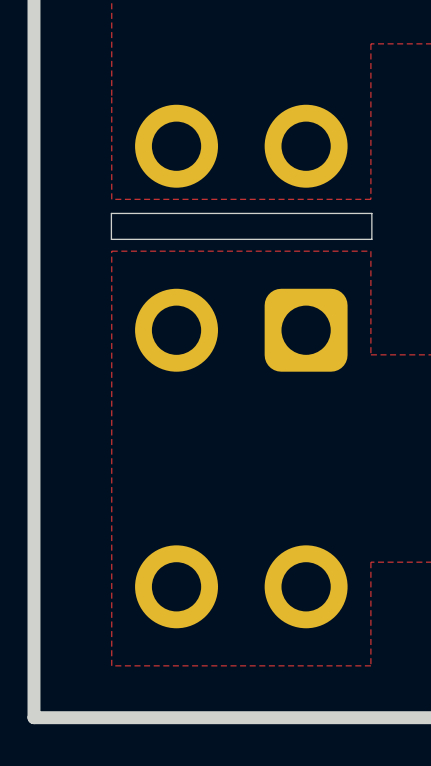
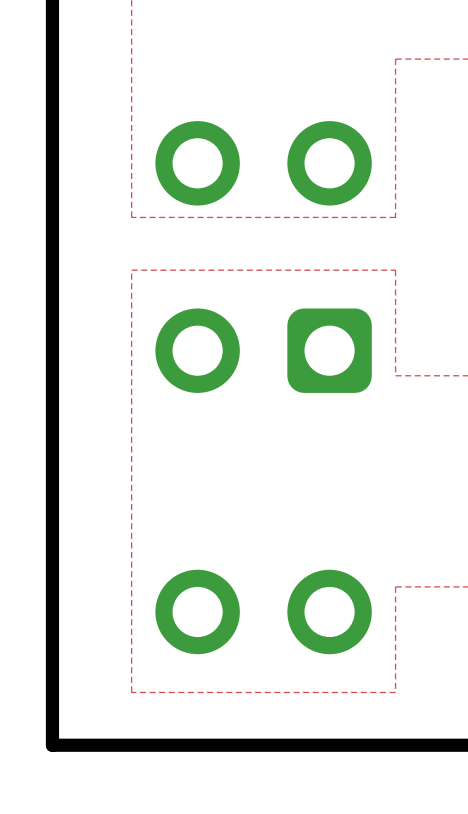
board edge: (111, 213) (371, 213) (371, 239) (111, 239) (111, 213) -> none

